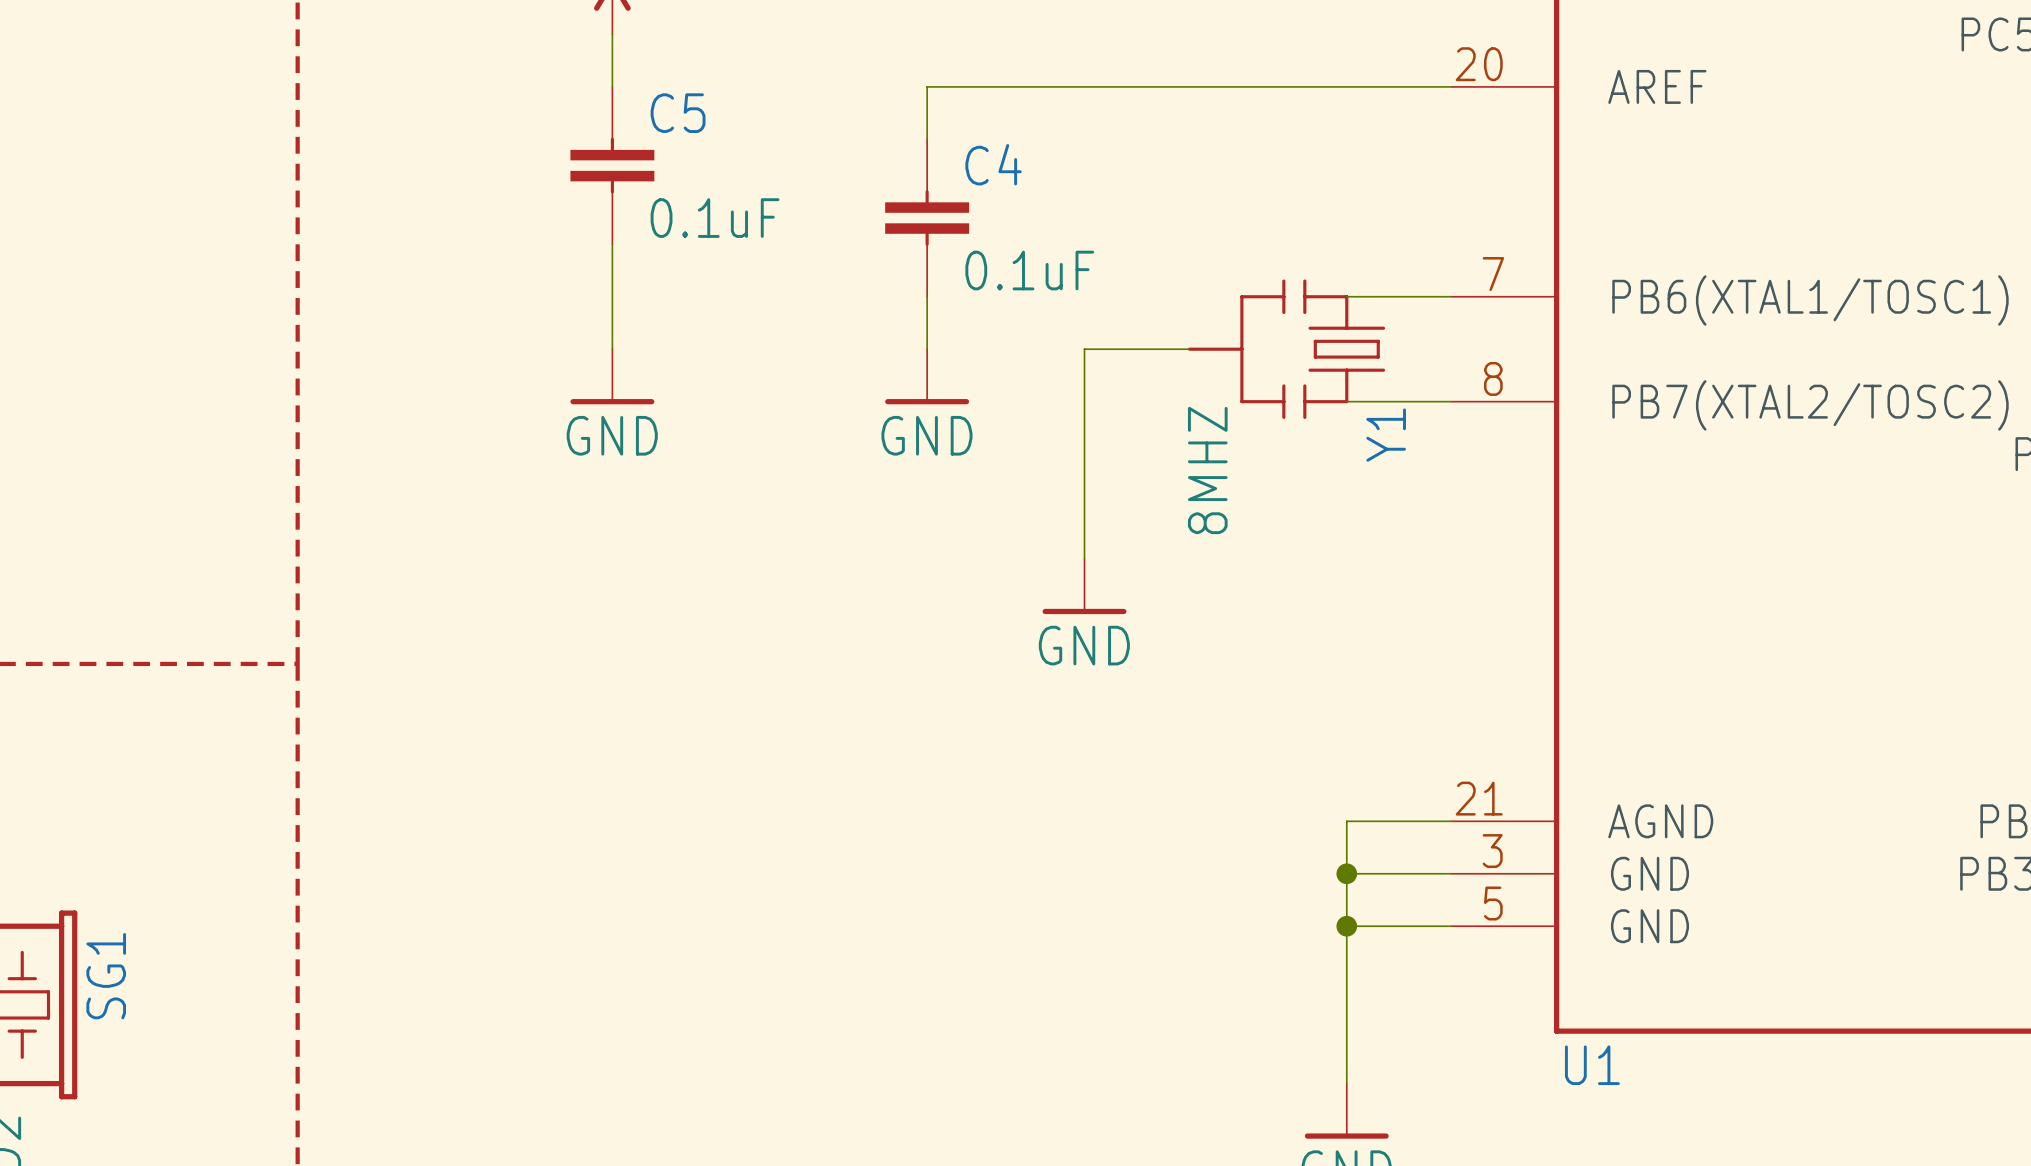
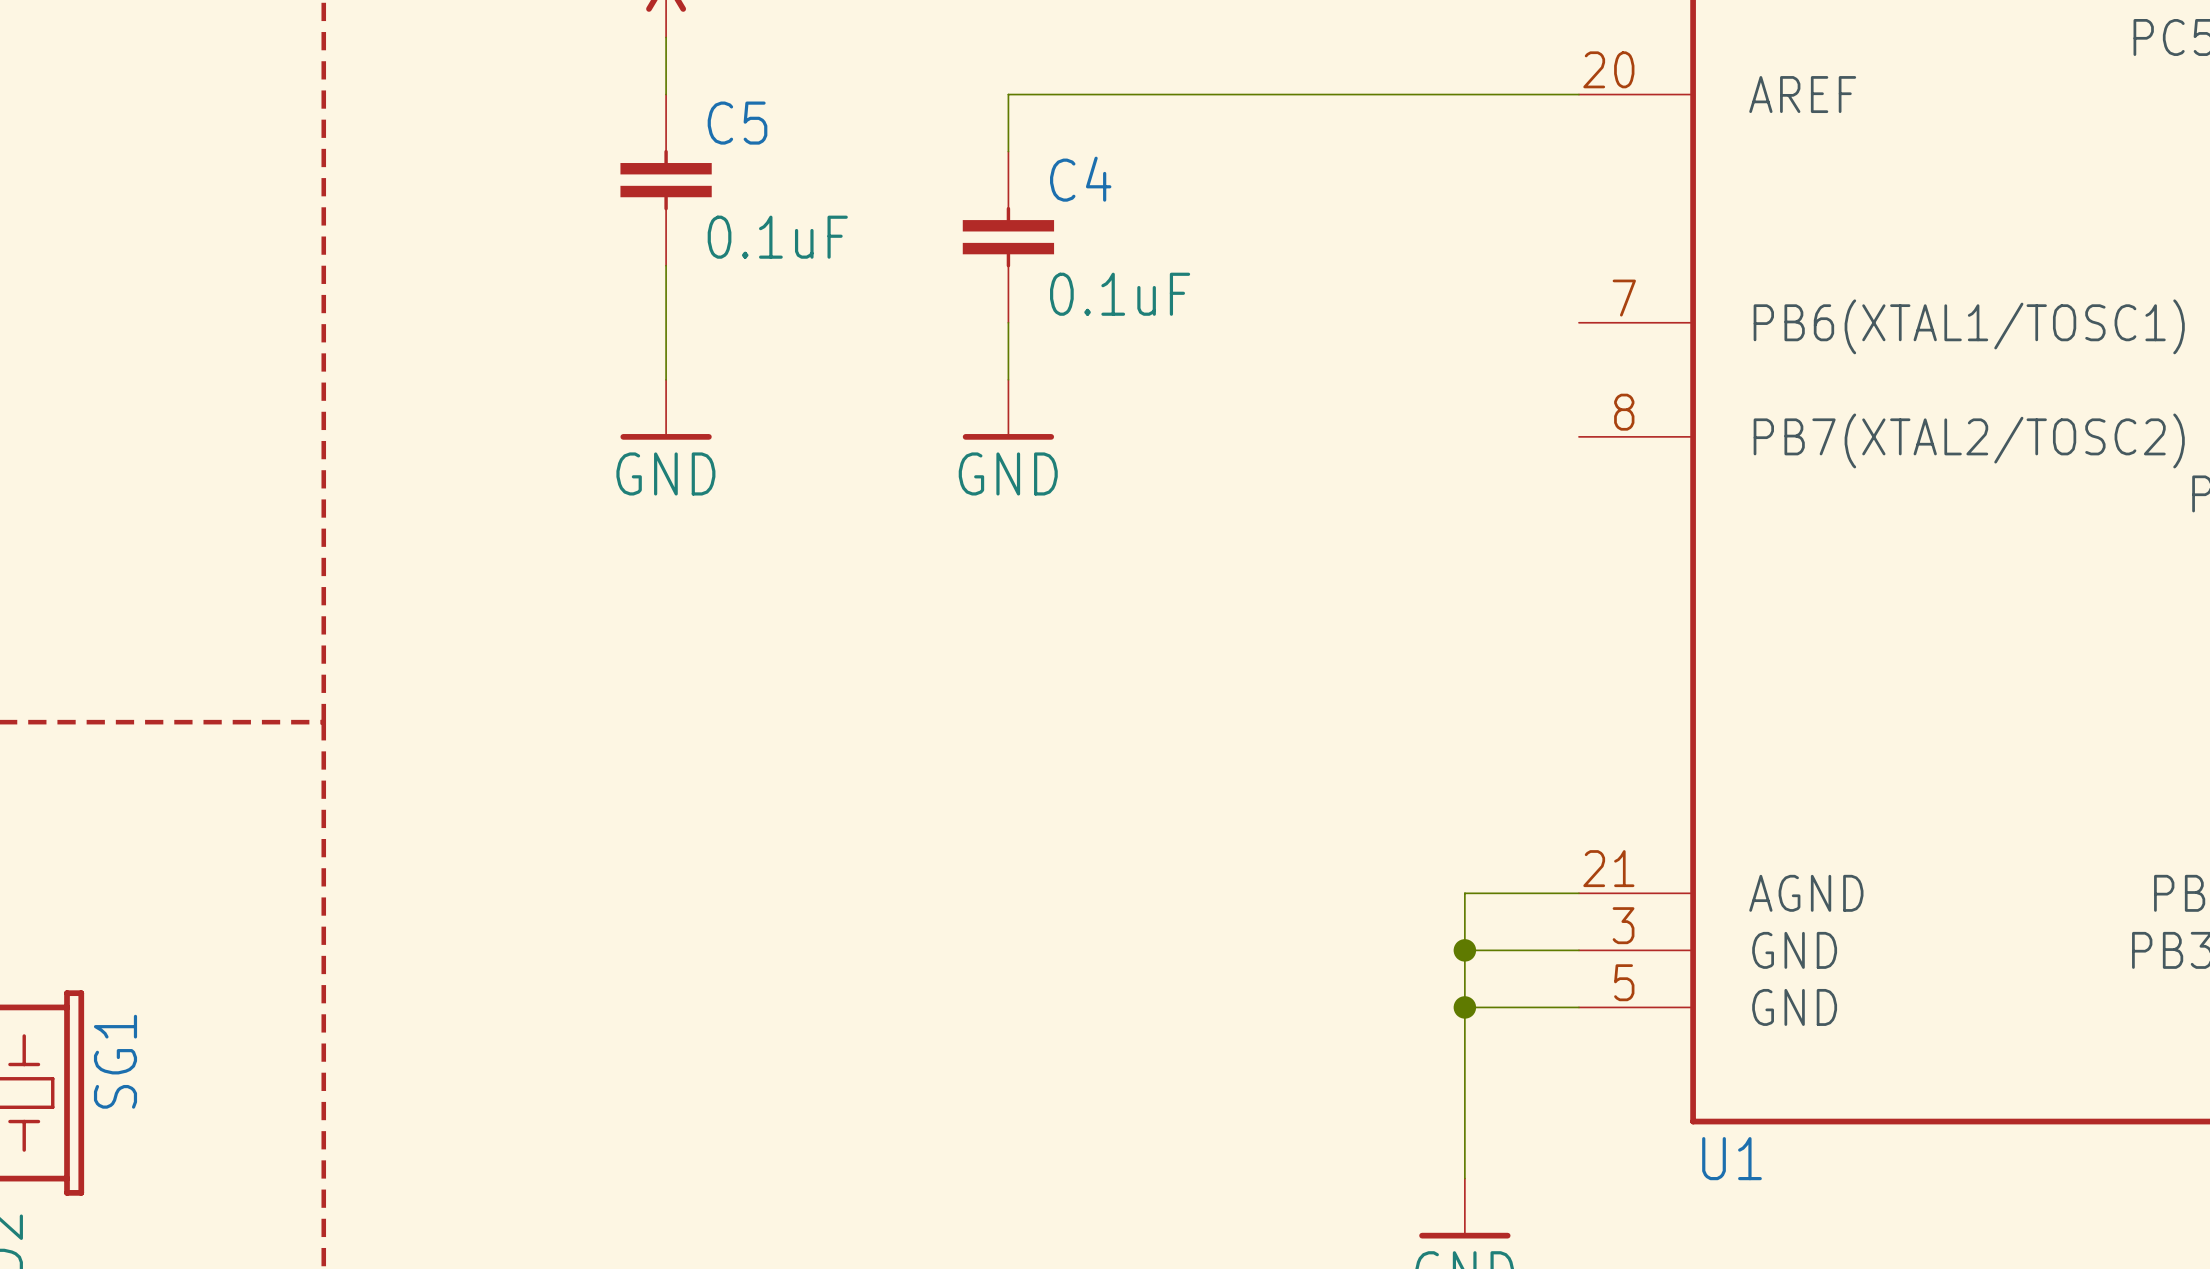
wire: (1346, 296) (1451, 296) -> none
wire: (1189, 349) (1084, 349) (1084, 559) -> none
Y1: 8MHZ (1286, 349) -> none
wire: (1346, 401) (1451, 401) -> none
power symbol: GND (1084, 586) -> none

